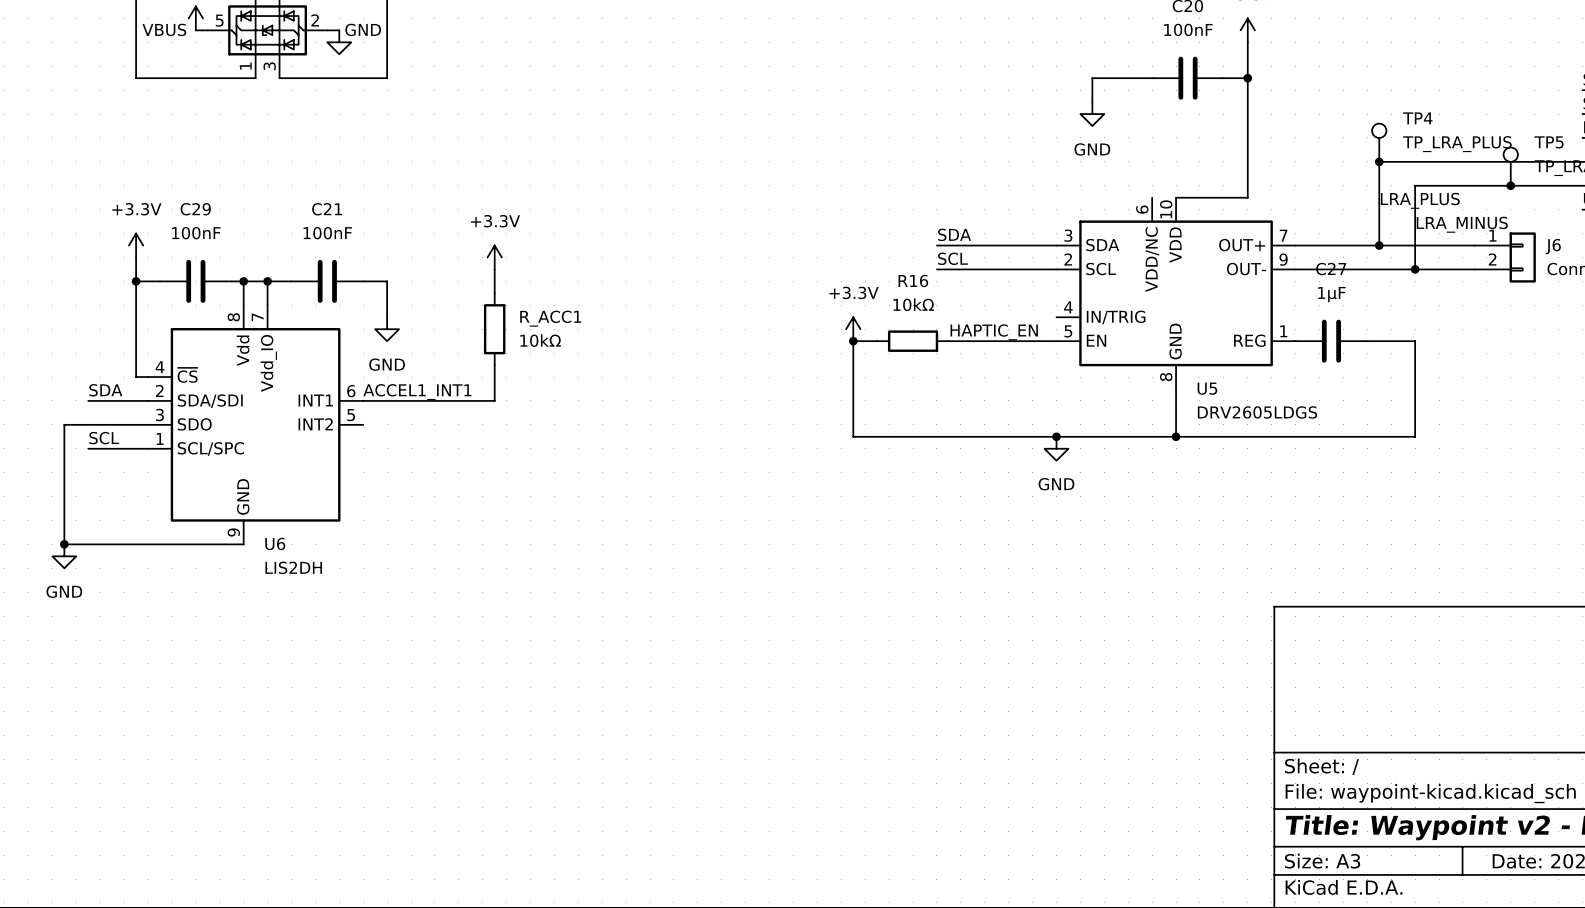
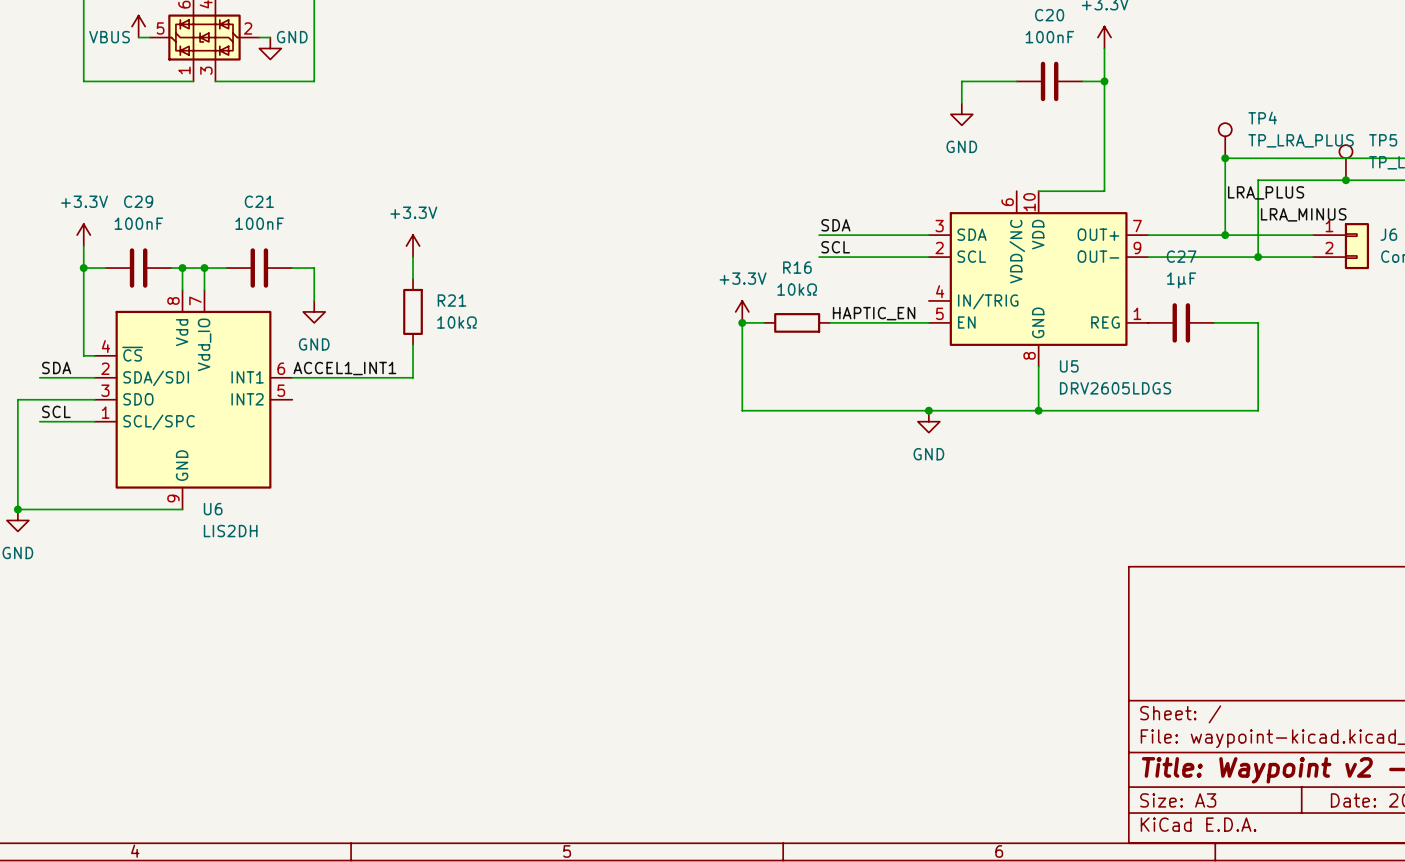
R_ACC1 name: R_ACC1 (550, 318) -> R21 (452, 300)

